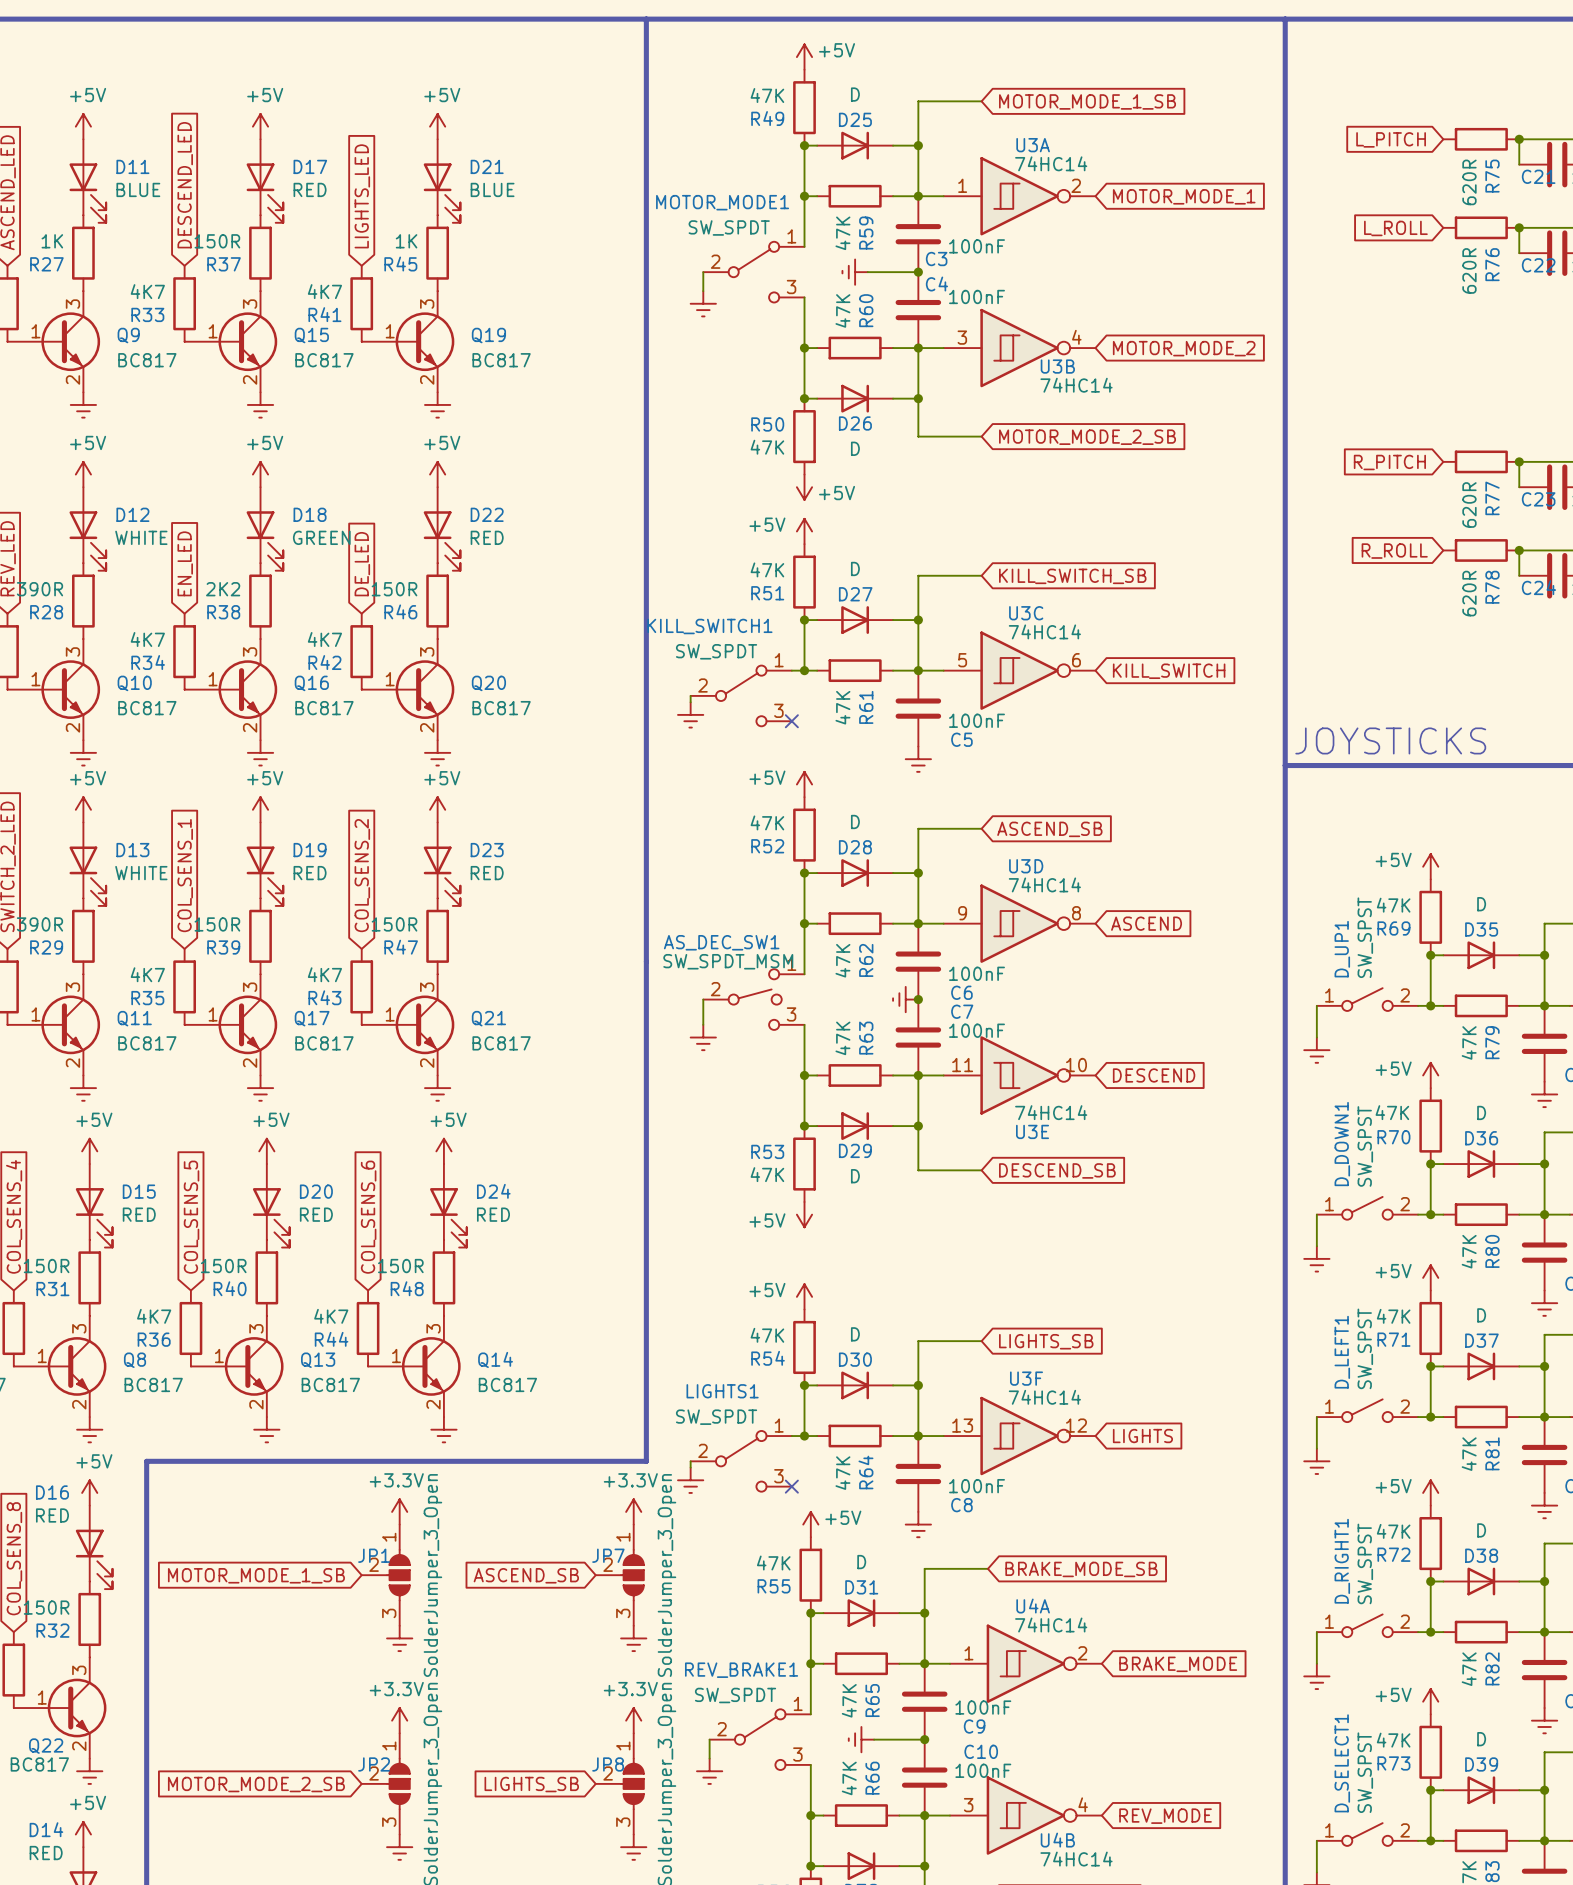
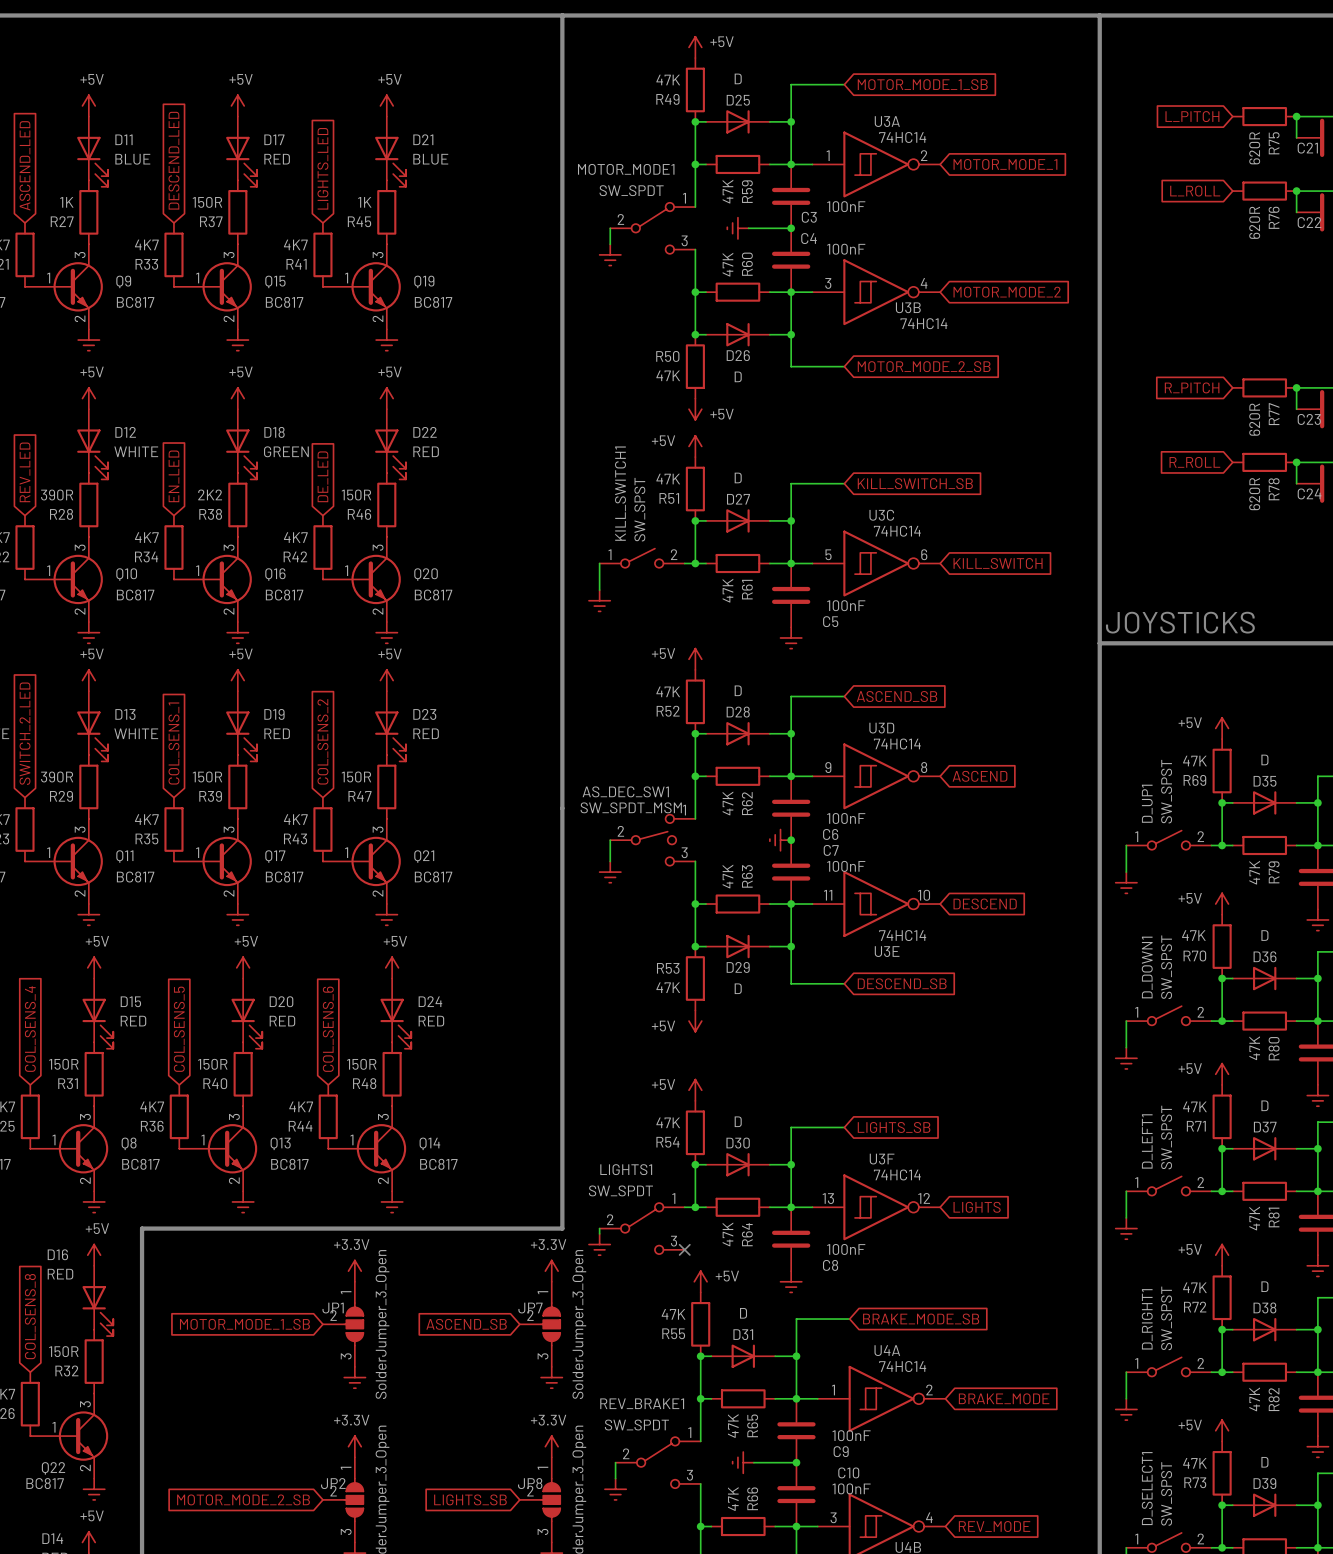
KILL_SWITCH1 name position: KILL_SWITCH1 (709, 626) -> KILL_SWITCH1 (620, 493)
KILL_SWITCH1 value: SW_SPDT (716, 651) -> SW_SPST (639, 509)
KILL_SWITCH1 symbol: [690, 665, 792, 727] -> [599, 548, 685, 568]
wire: none -> (599, 563) (599, 584)
no-connect mark: (791, 721) -> none

